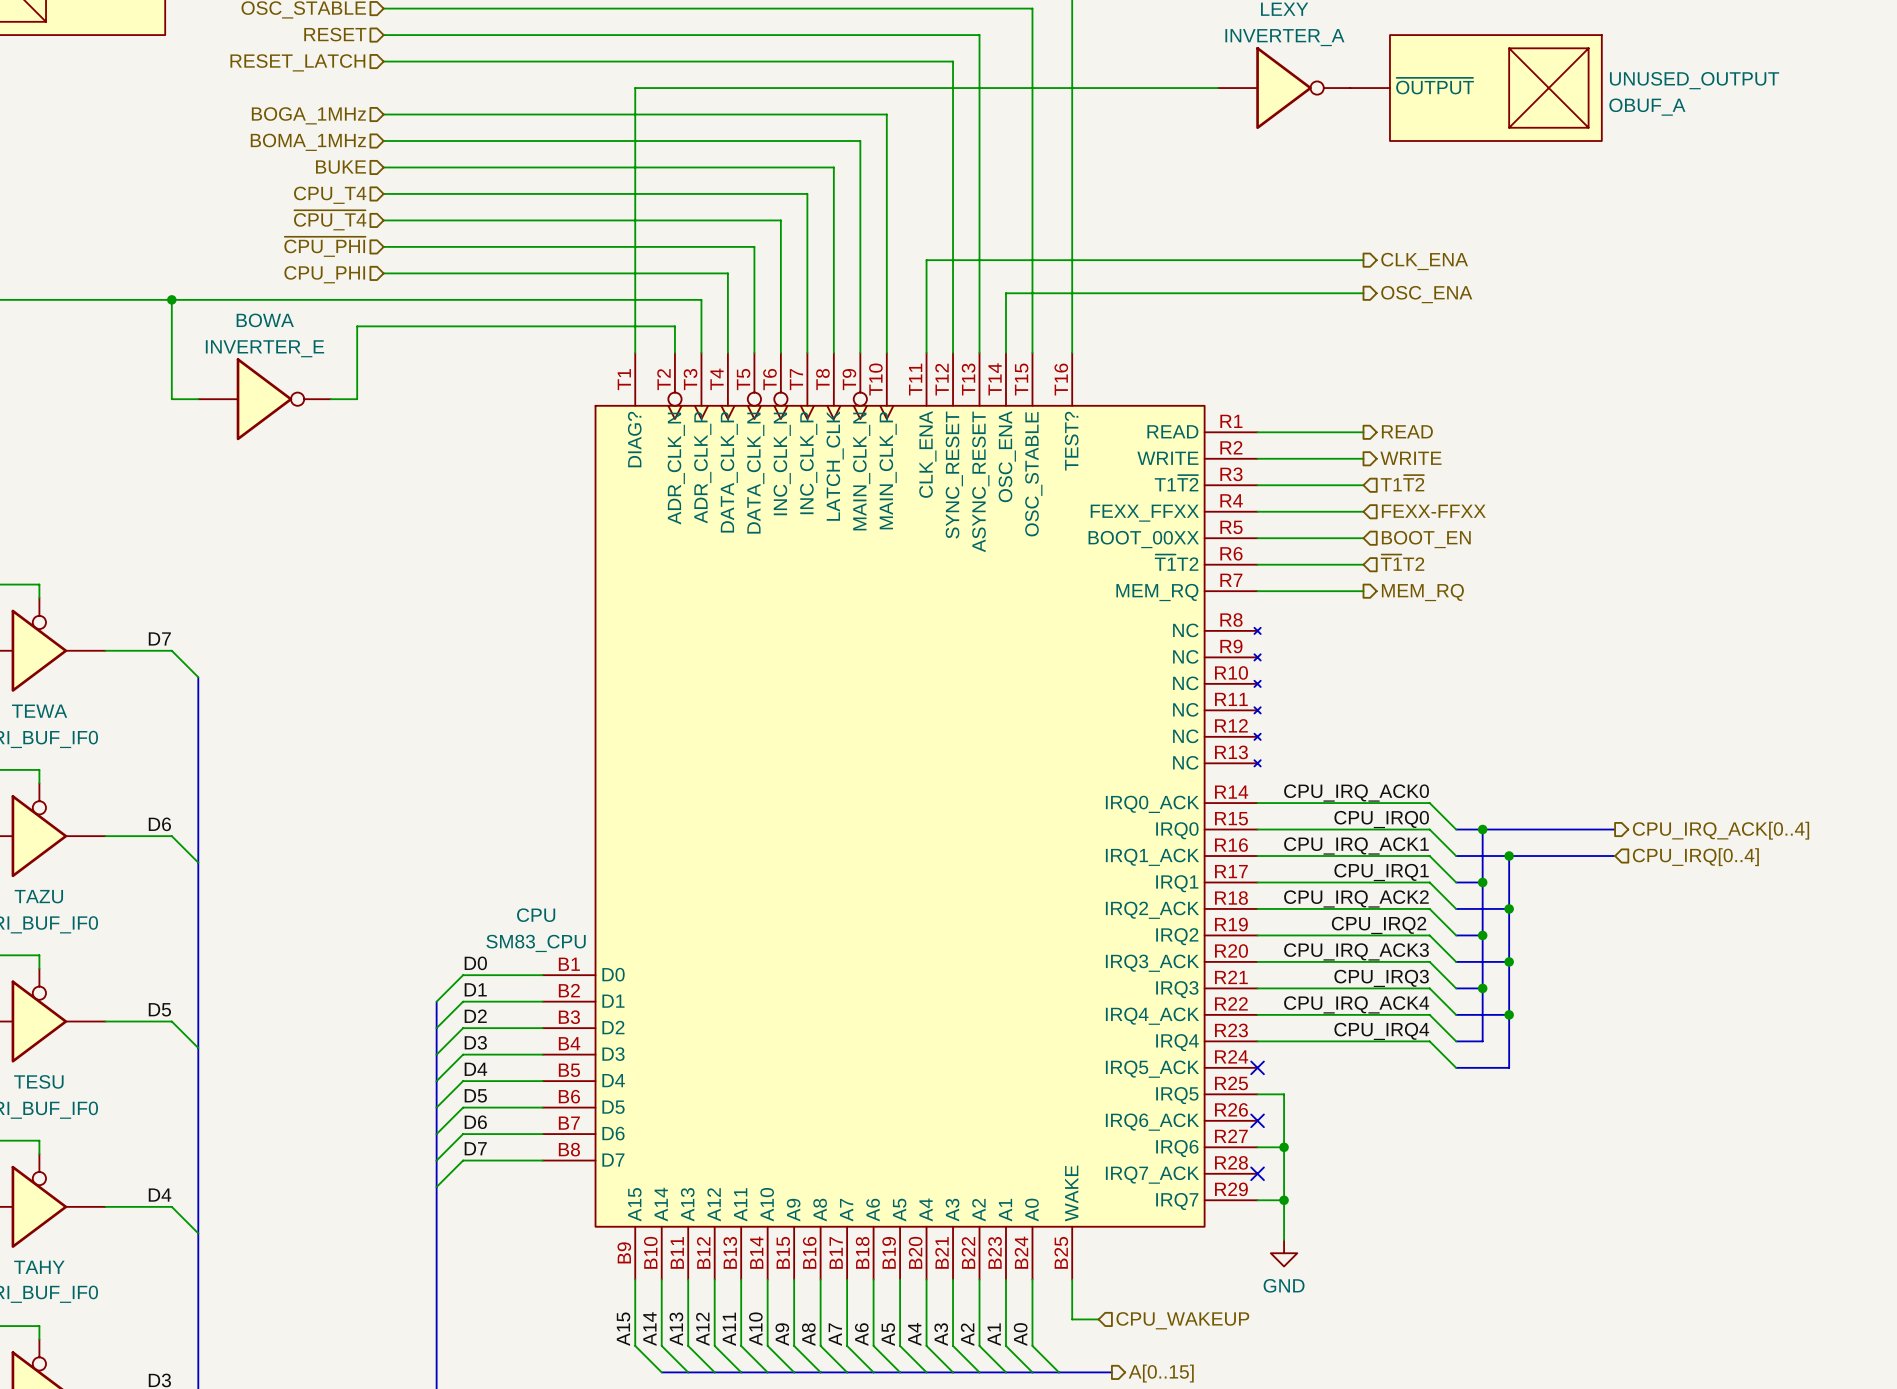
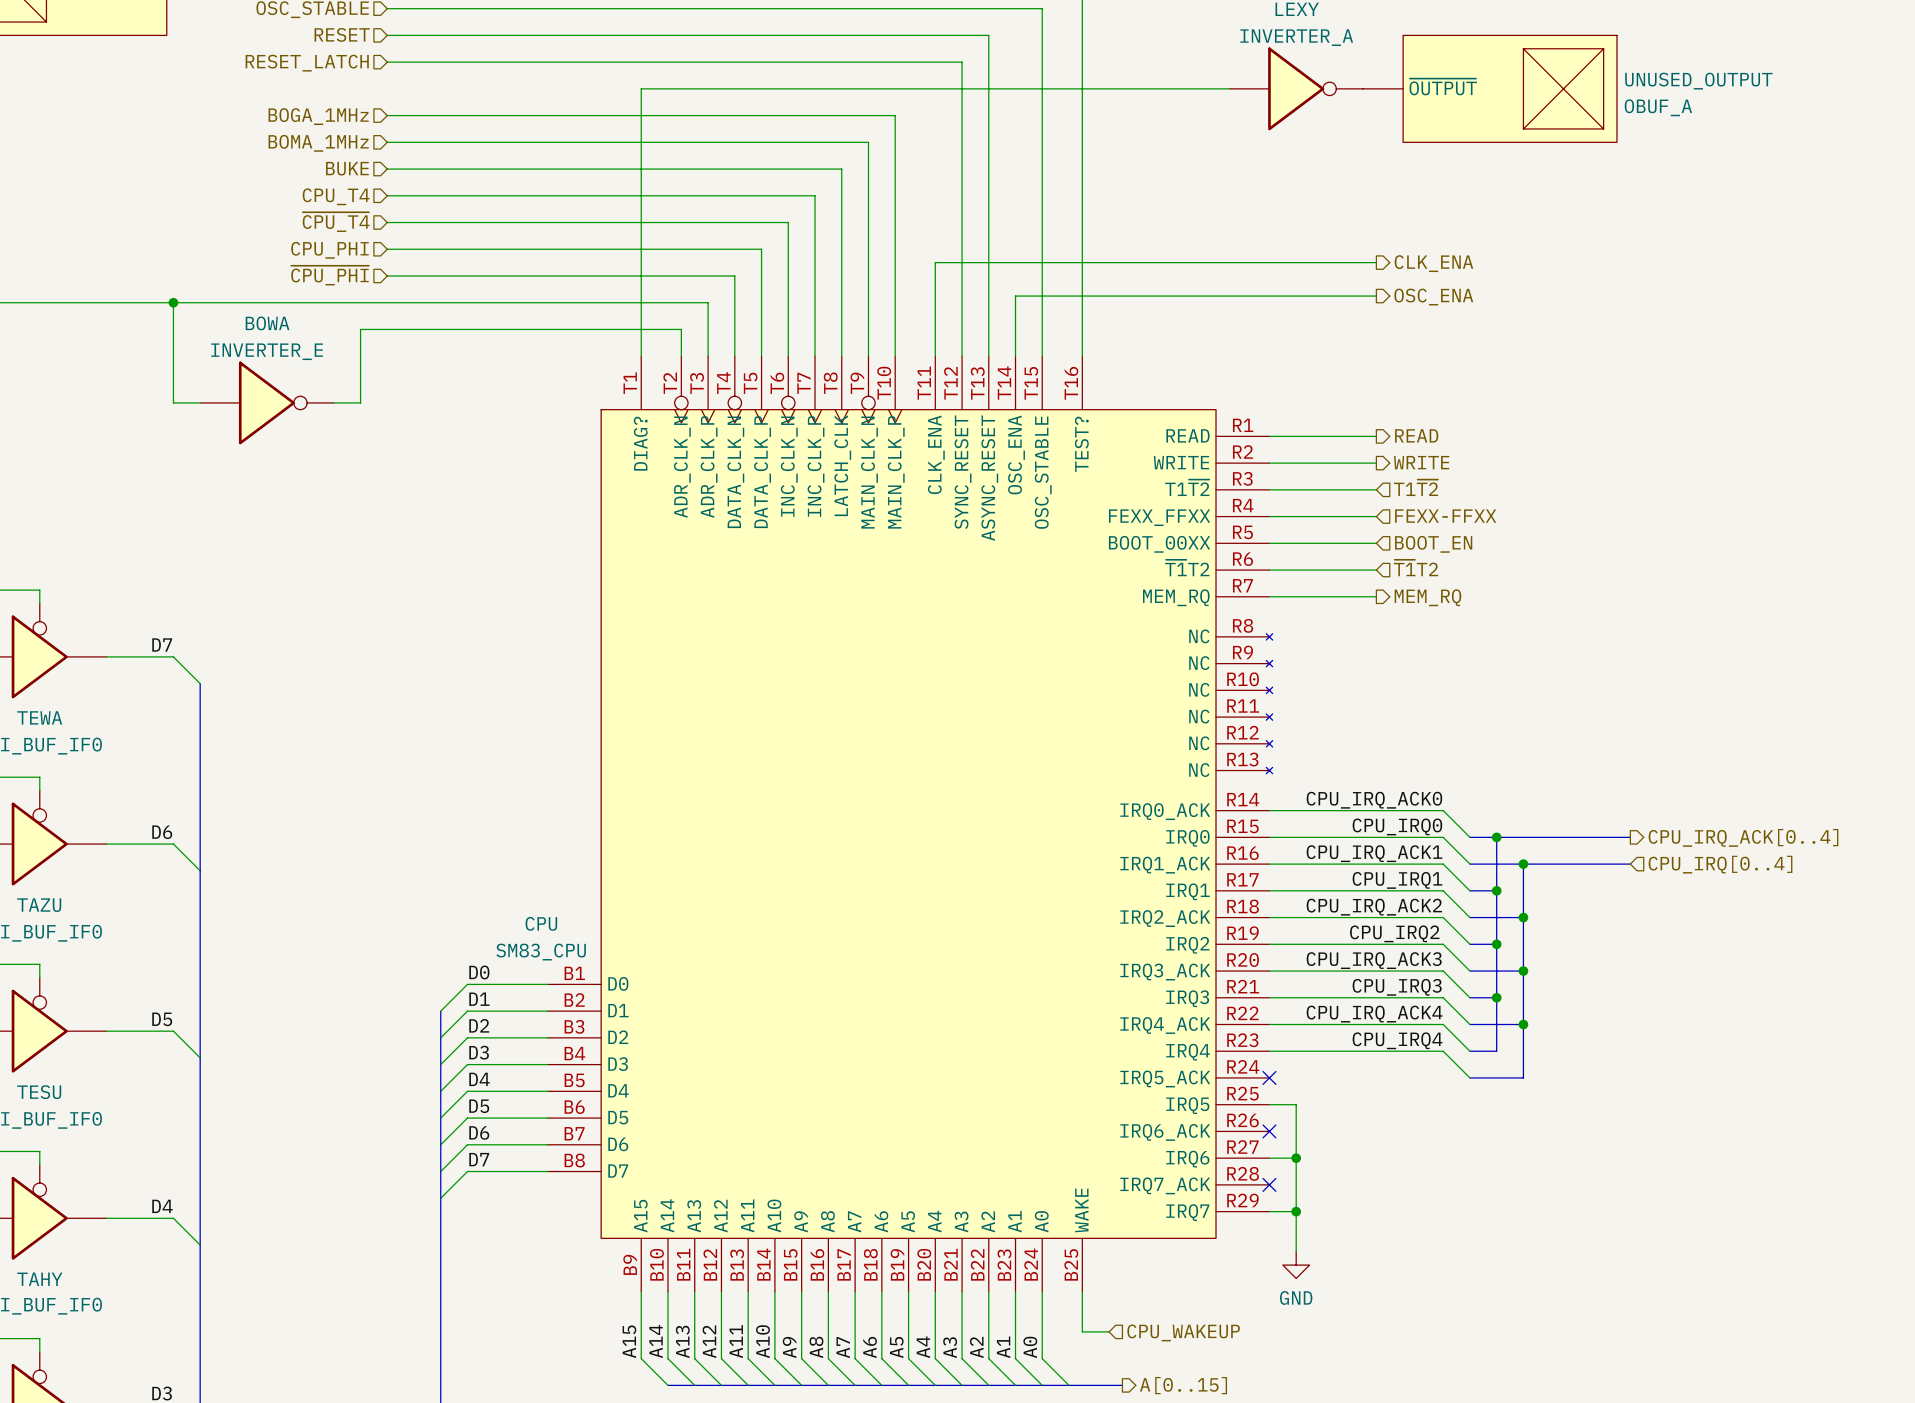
hierarchical label: ~{CPU_PHI} (324, 246) -> CPU_PHI (329, 250)
hierarchical label: CPU_PHI (324, 274) -> ~{CPU_PHI} (330, 275)
CPU symbol: [542, 352, 1261, 1280] -> [547, 356, 1273, 1292]

